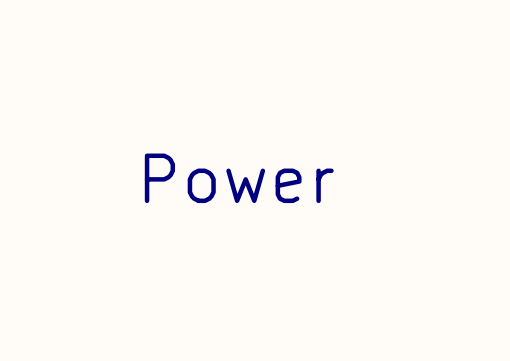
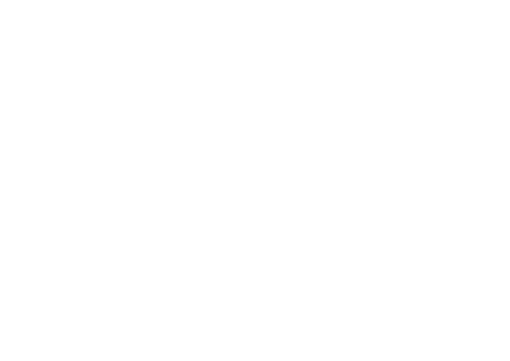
text: Power (239, 178) -> none

